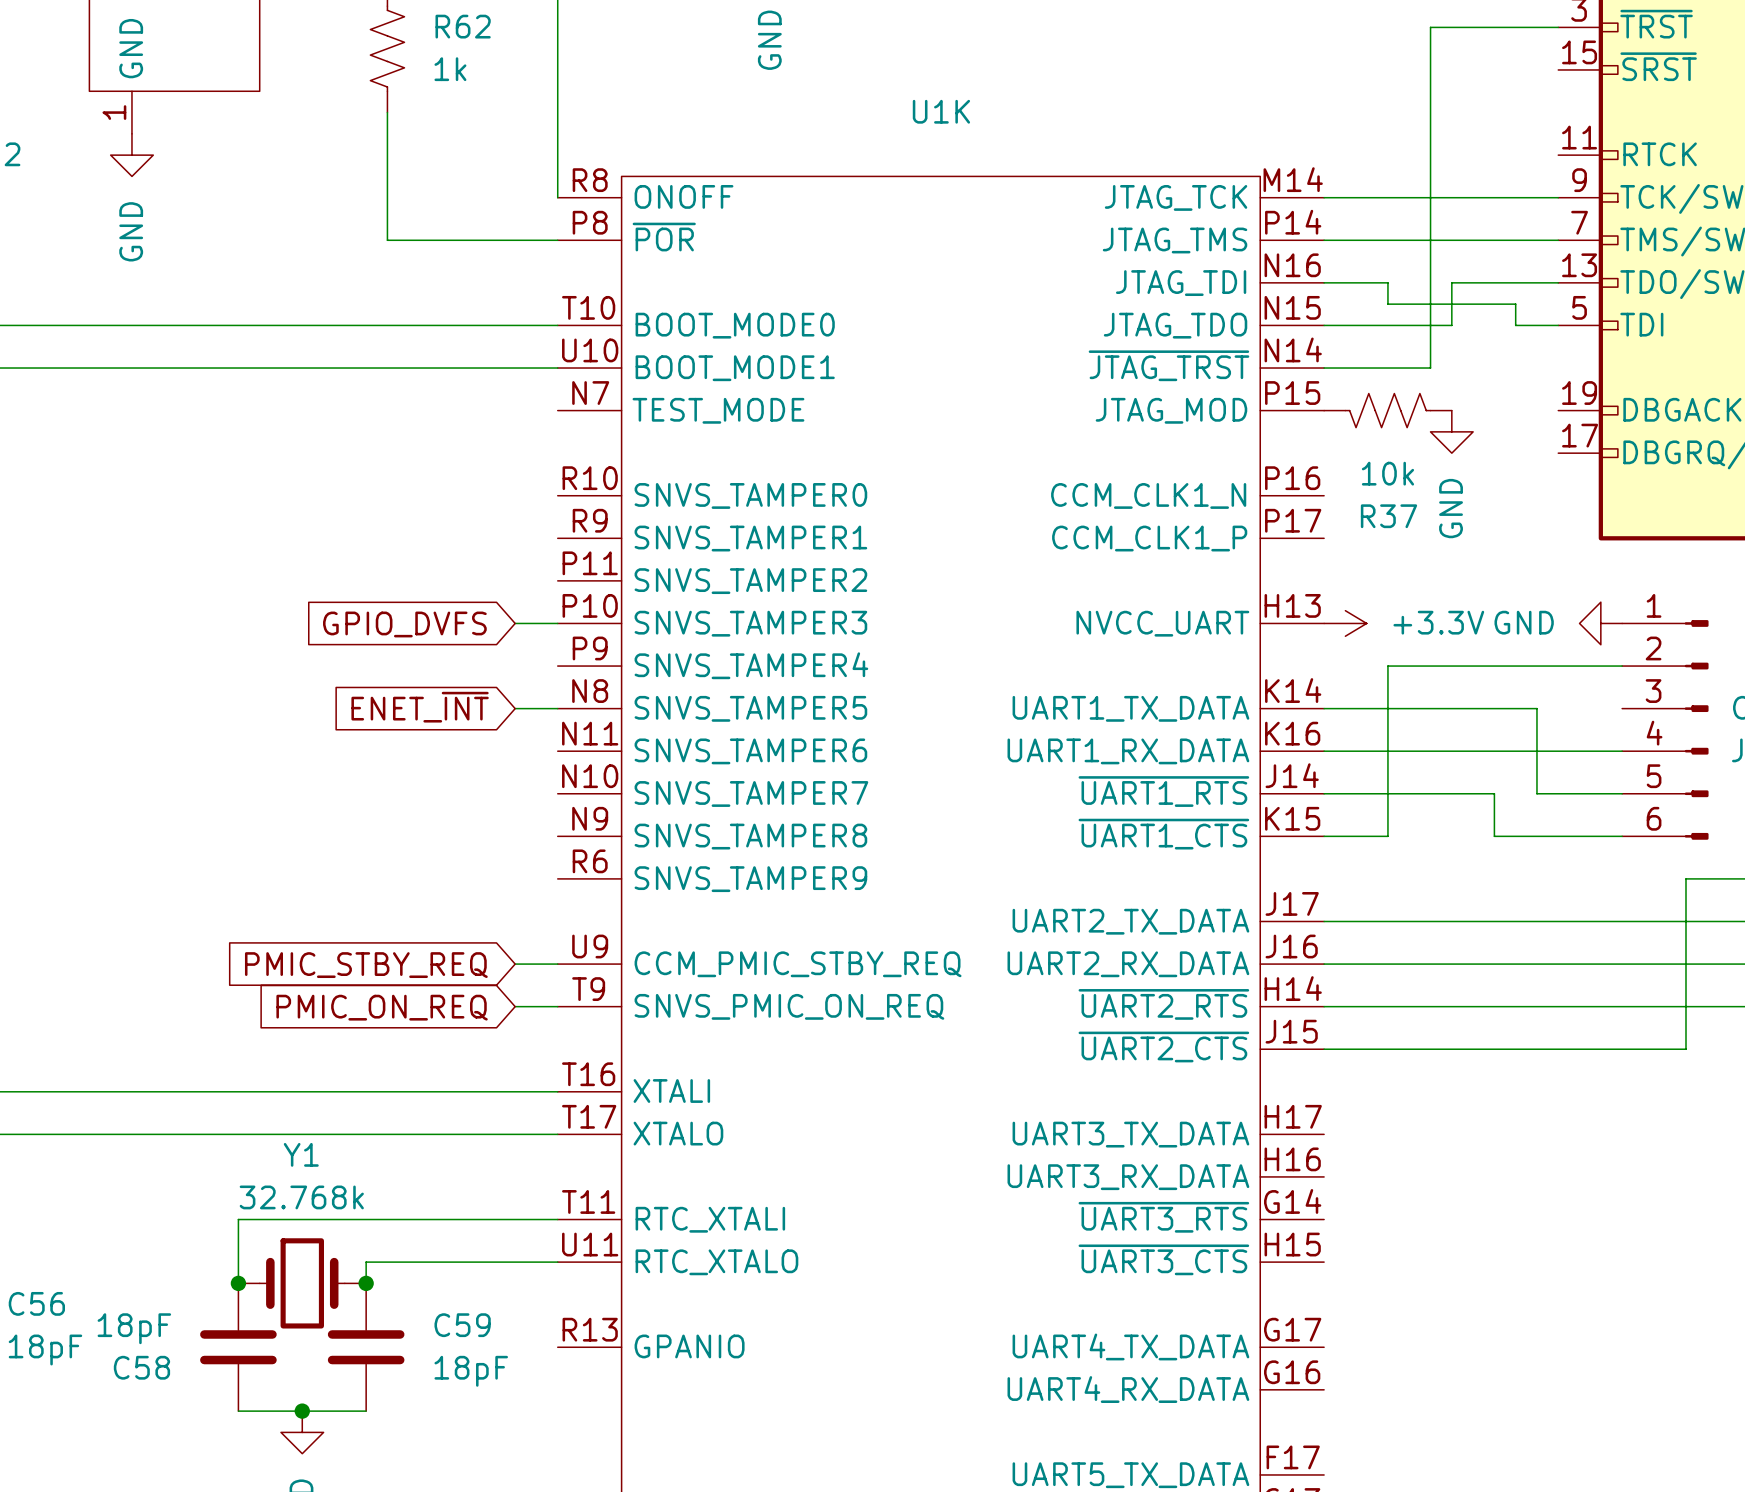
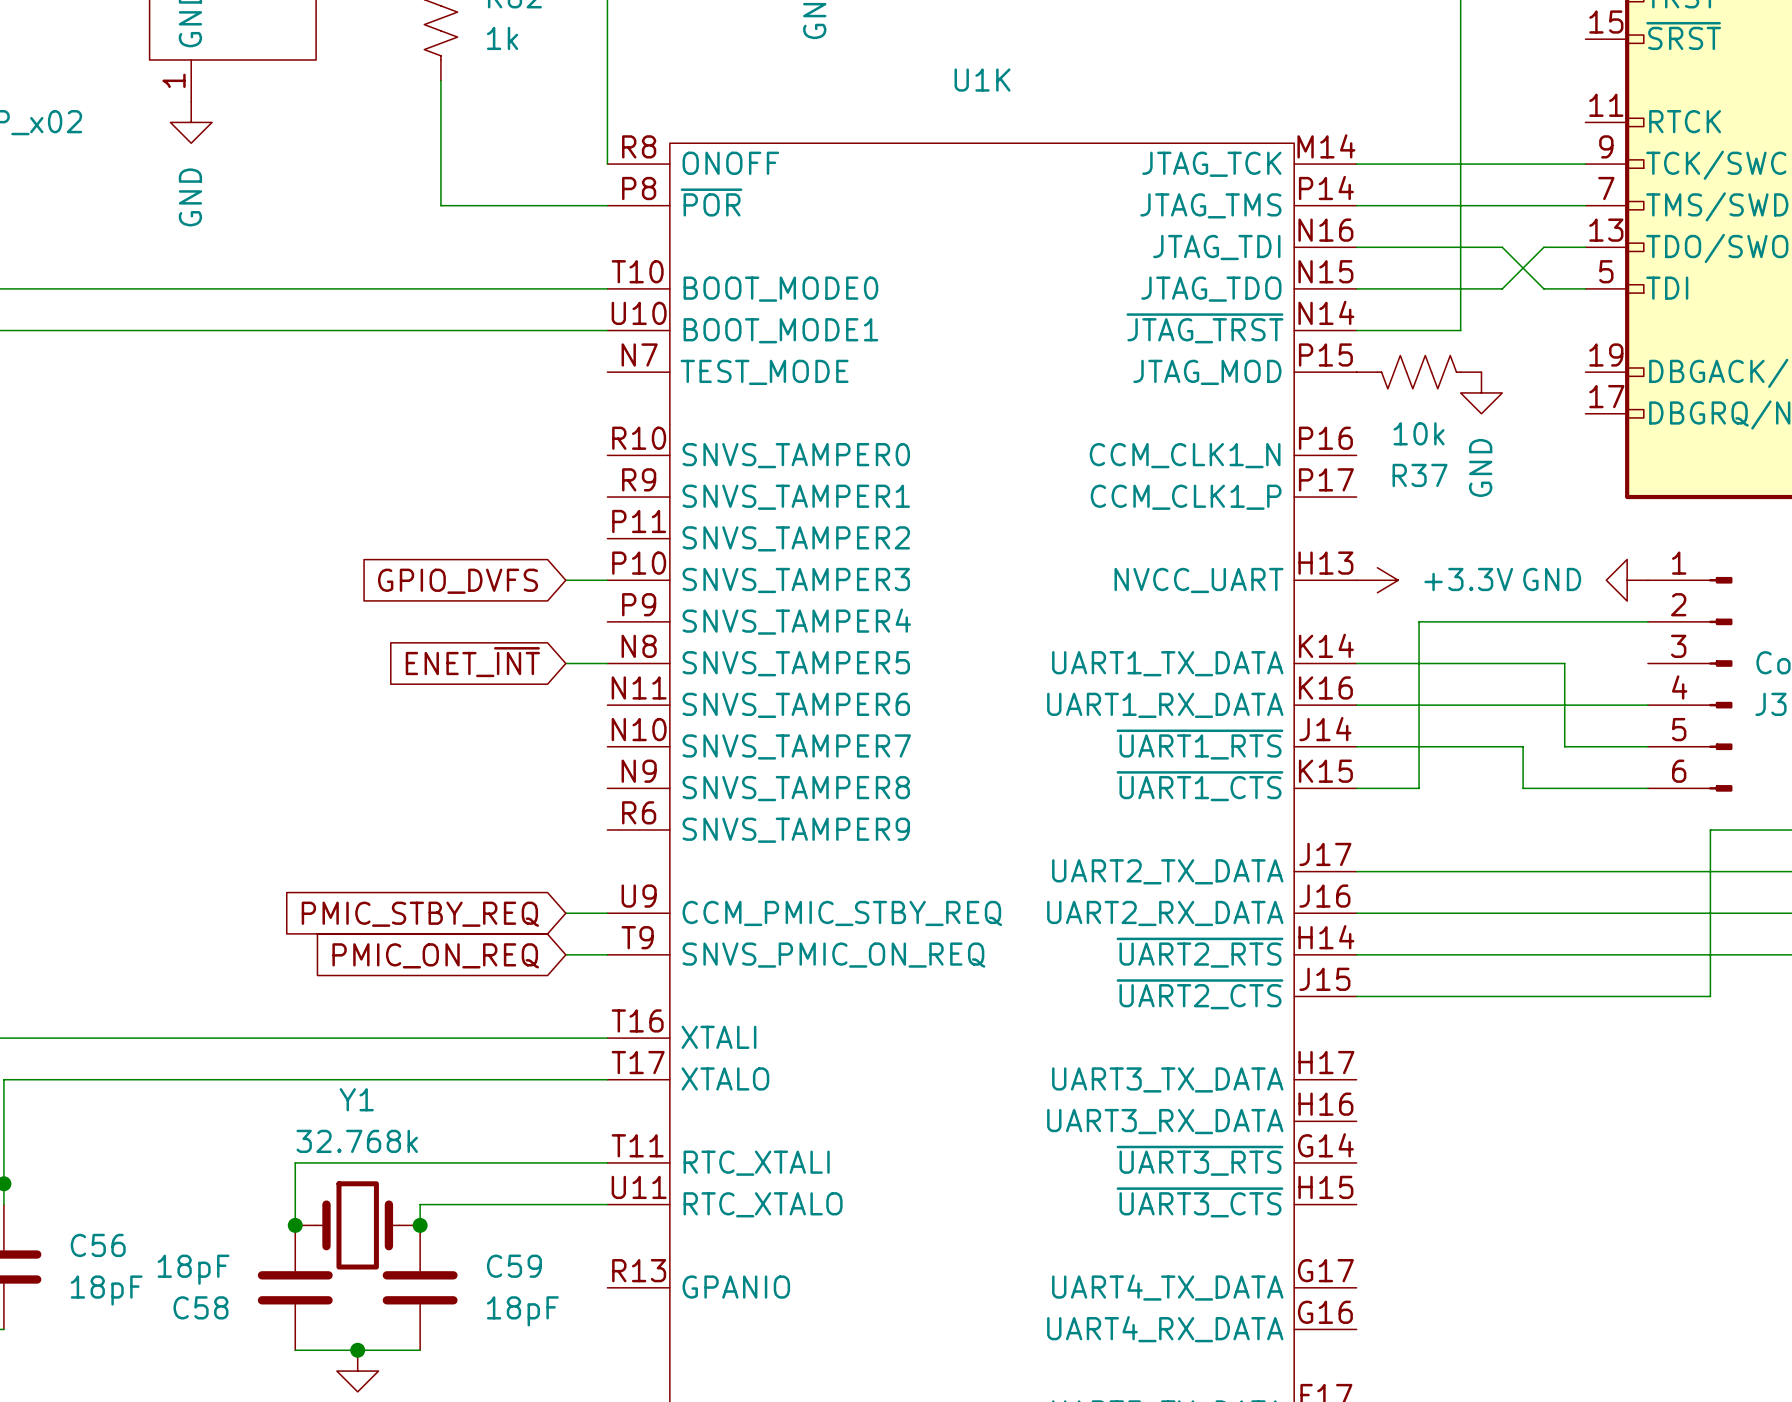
wire: (1387, 282) (1387, 304) (1515, 304) (1515, 325) -> (1419, 247) (1481, 247)
wire: (1451, 282) (1451, 325) -> (1543, 247) (1502, 288) (1481, 288)
wire: (1473, 282) (1515, 282) -> (1502, 247) (1543, 288)

